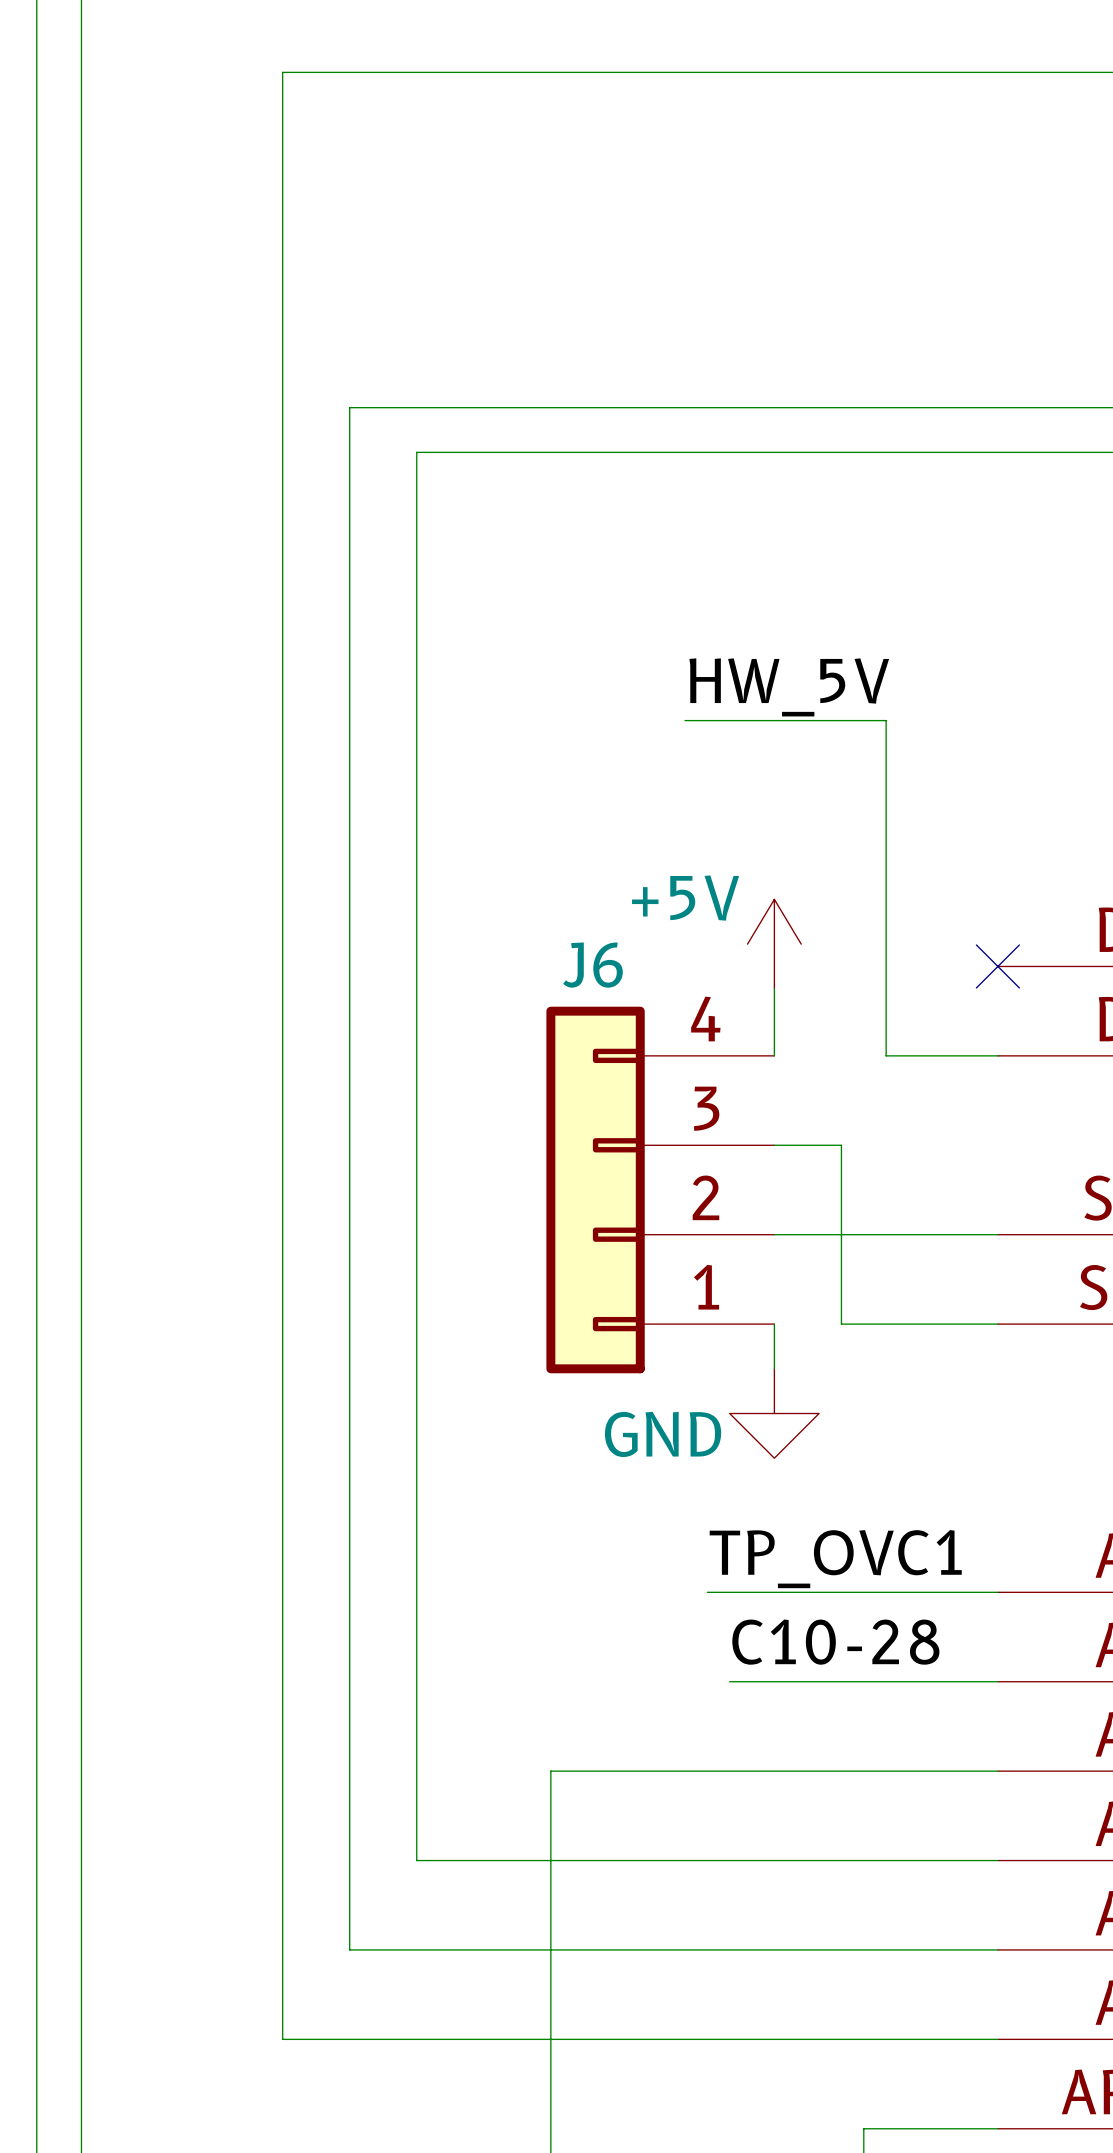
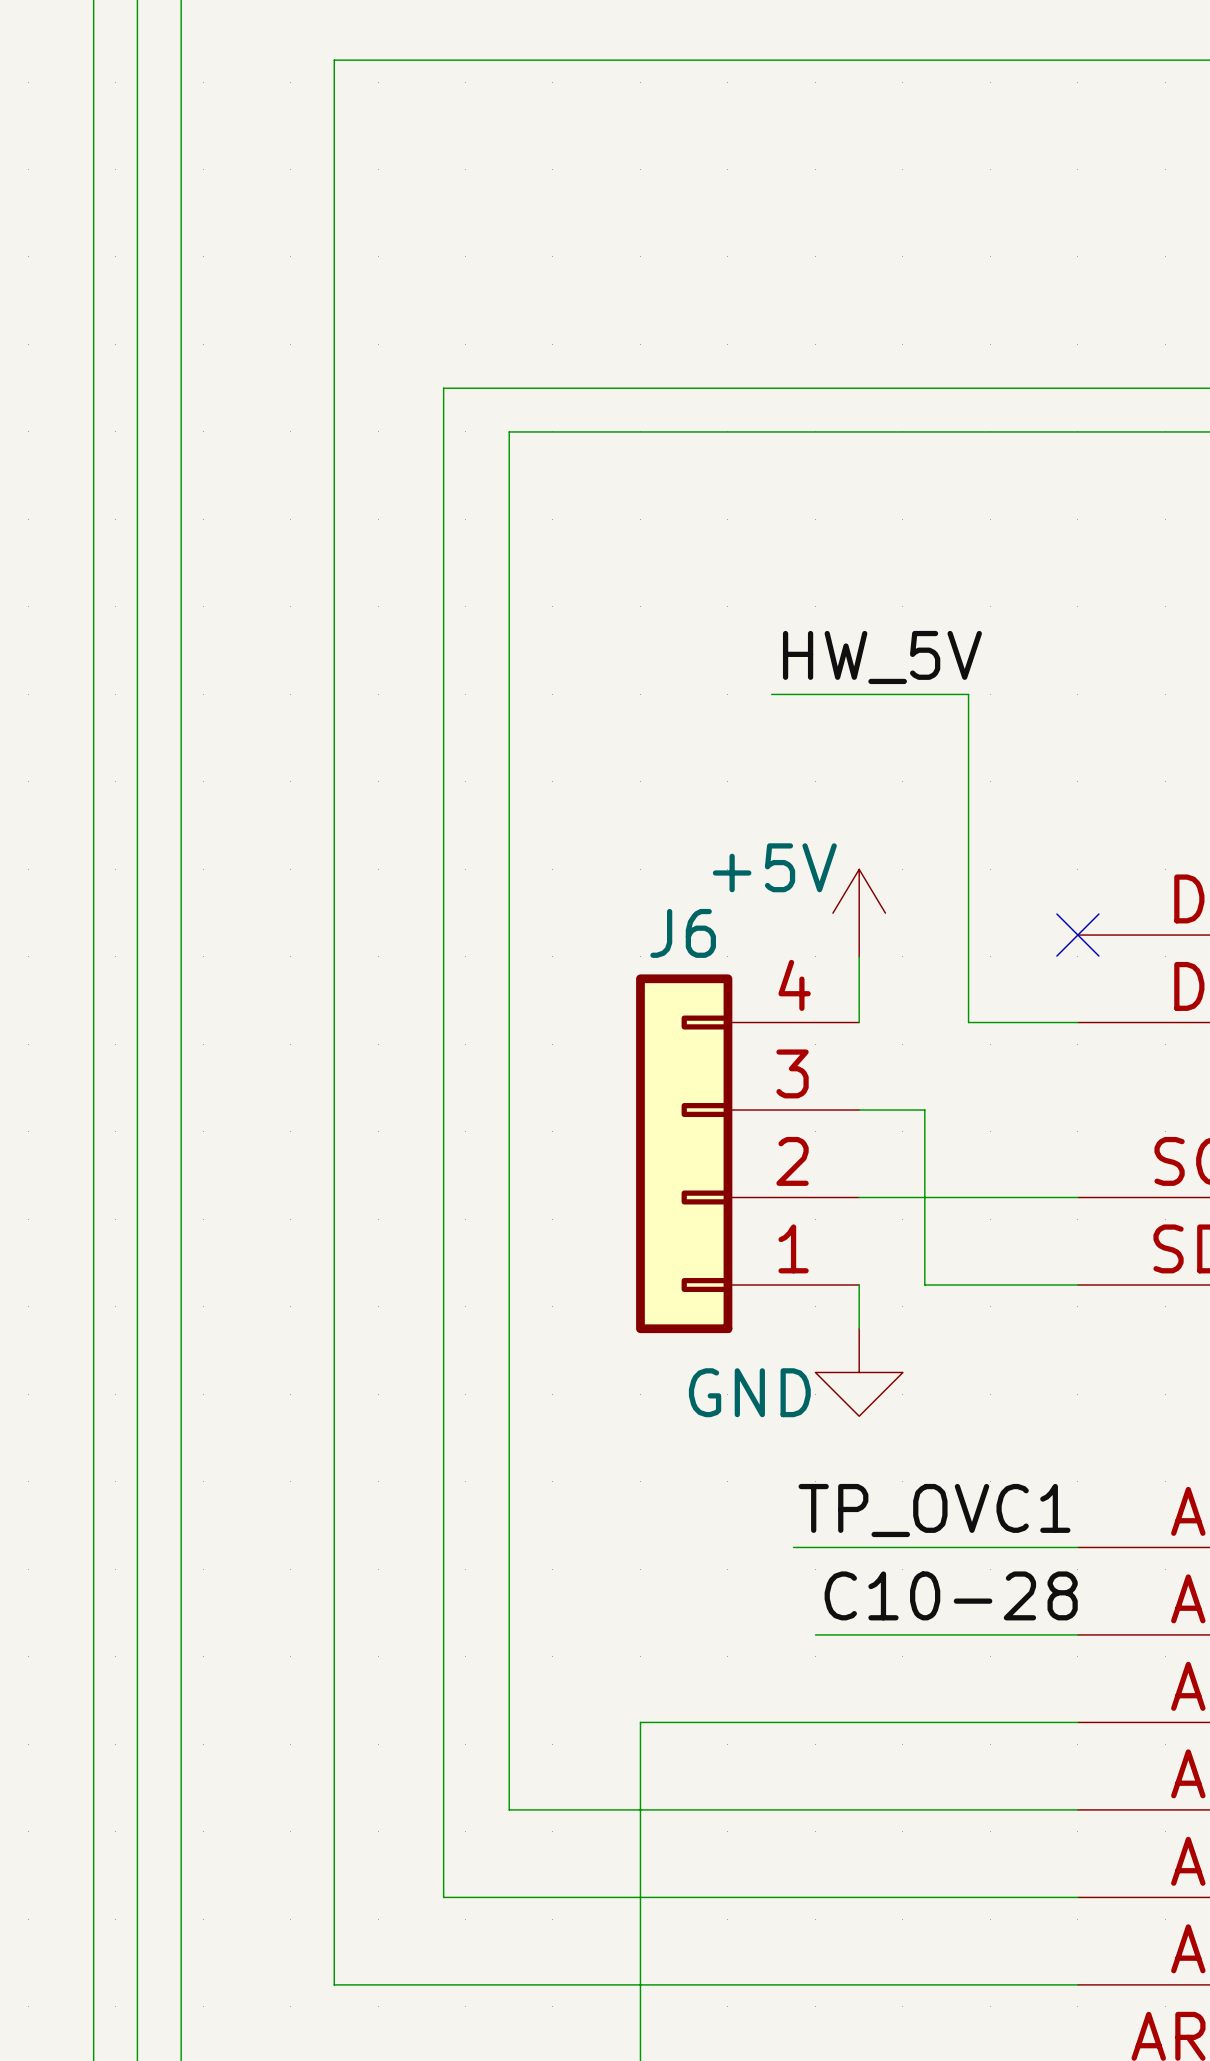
wire: (282, 72) (282, 2039) -> (378, 60) (334, 60) (334, 1984) (378, 1984)

